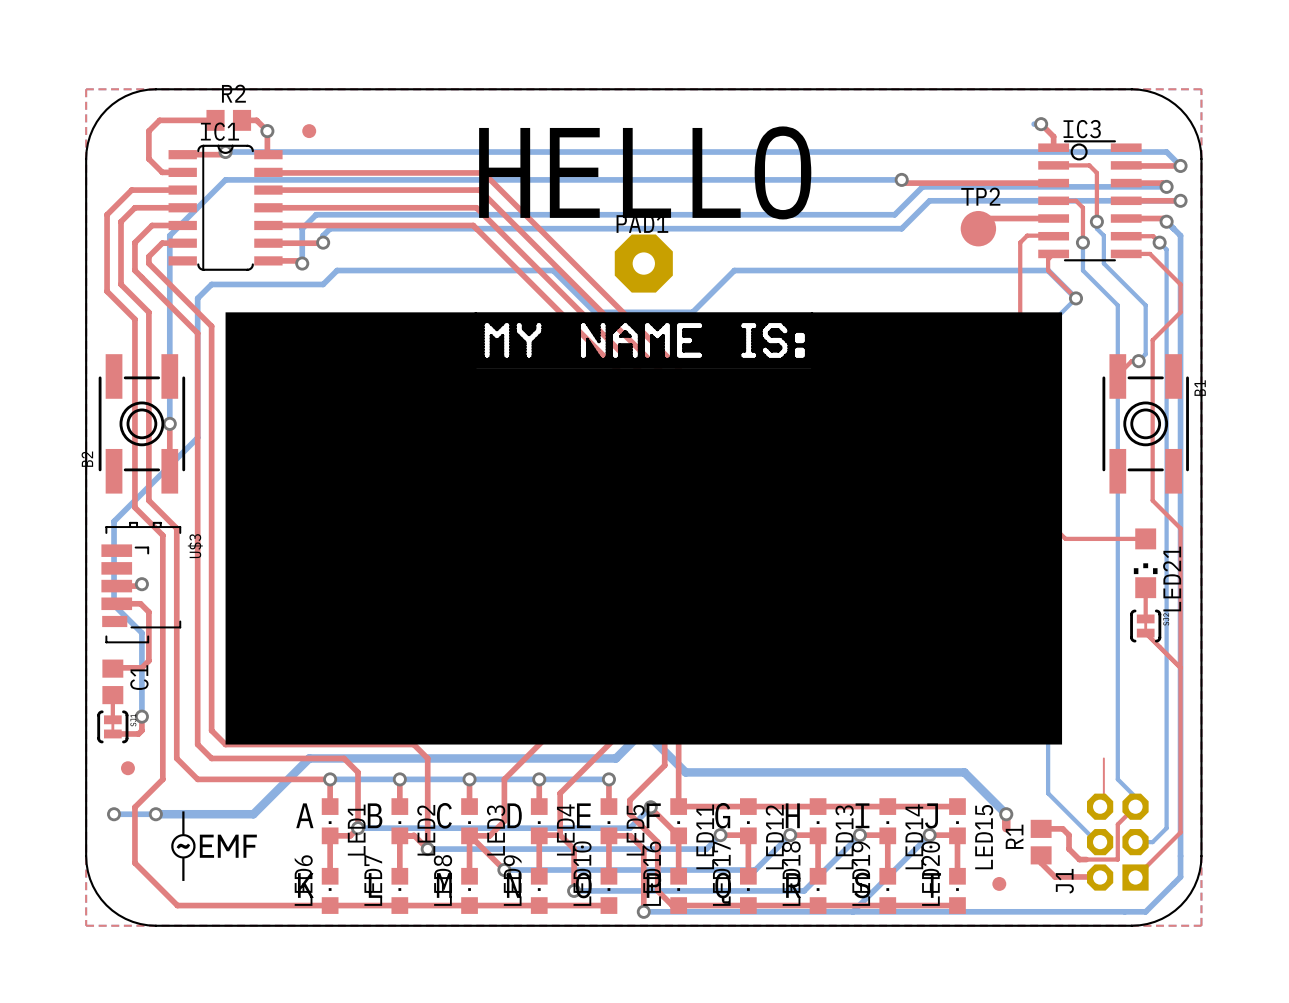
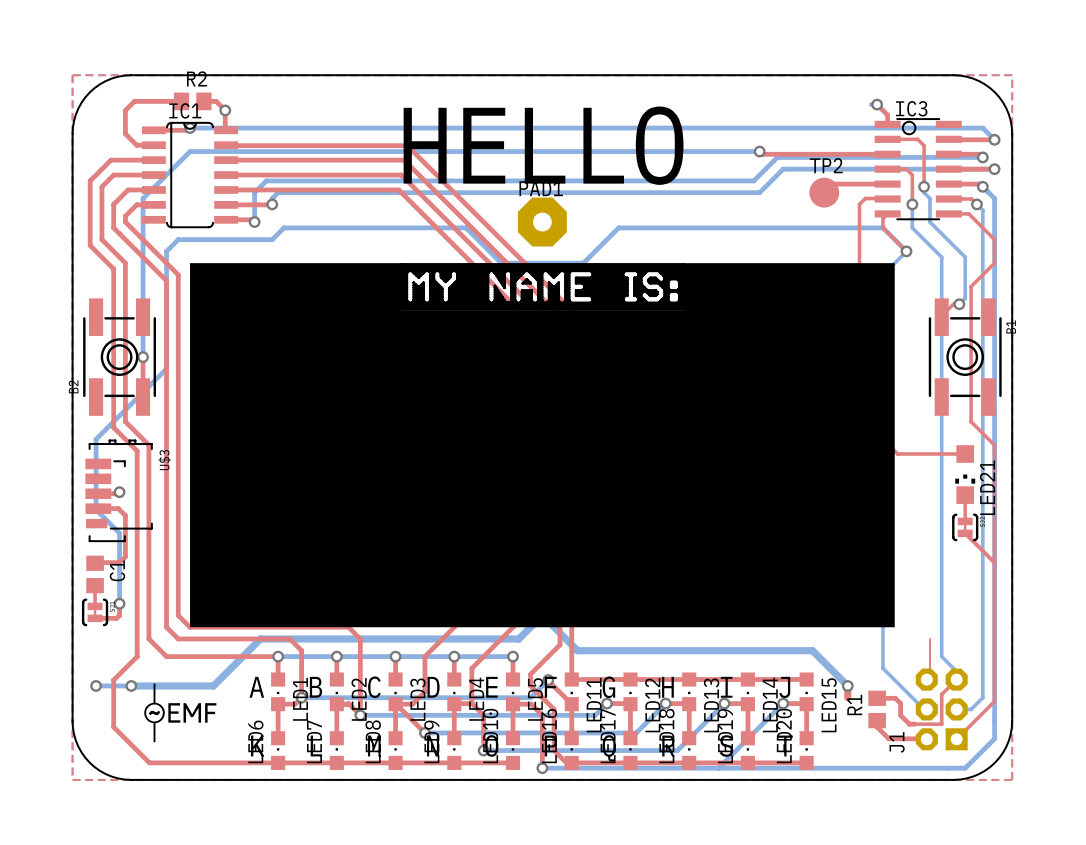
part: (309, 131) -> none
part: (127, 768) -> none
part: (999, 883) -> none

